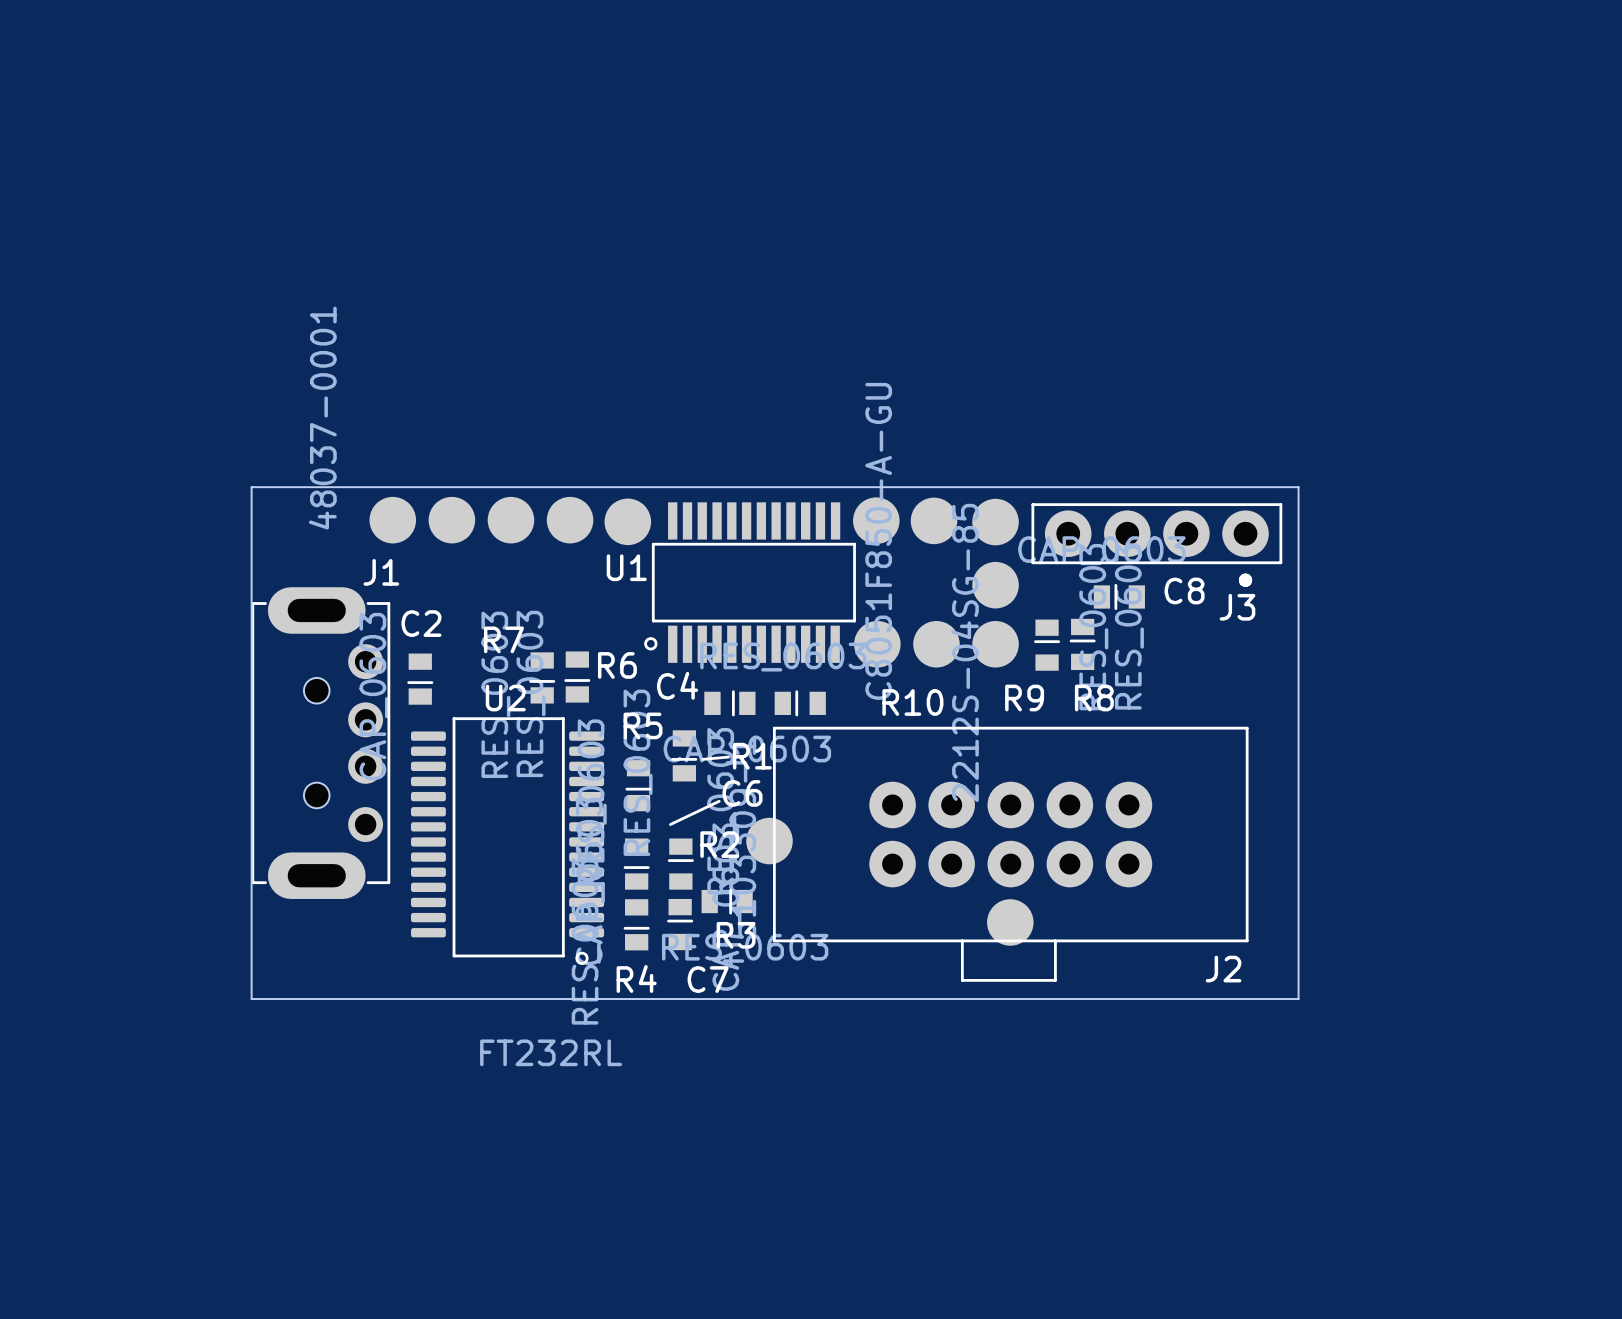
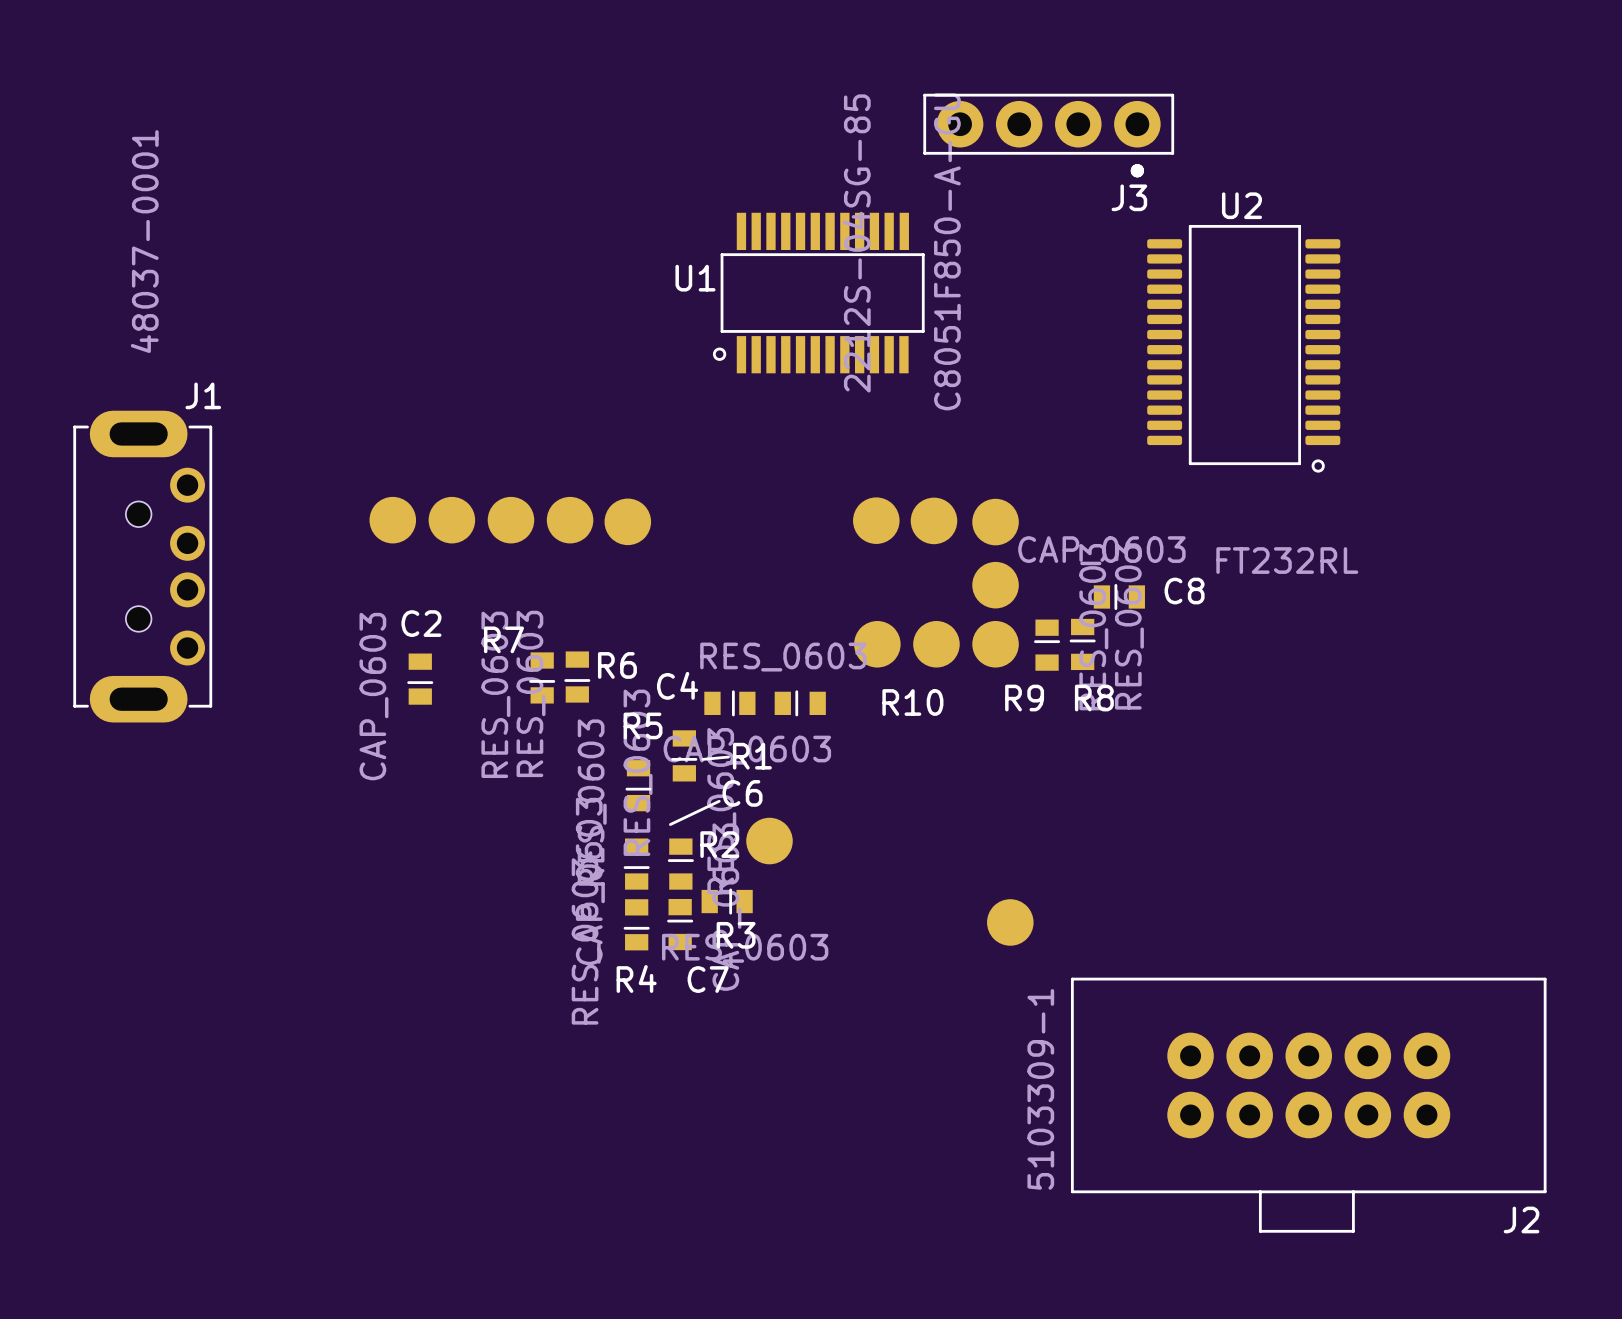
board edge: (251, 487) (251, 999) (1298, 999) (1298, 487) (251, 487) -> none
J3 position: (1156, 545) -> (1048, 135)
U1 position: (750, 582) -> (818, 293)
J1 position: (320, 743) -> (142, 566)
U2 position: (507, 841) -> (1243, 348)
J2 position: (1010, 854) -> (1308, 1105)

